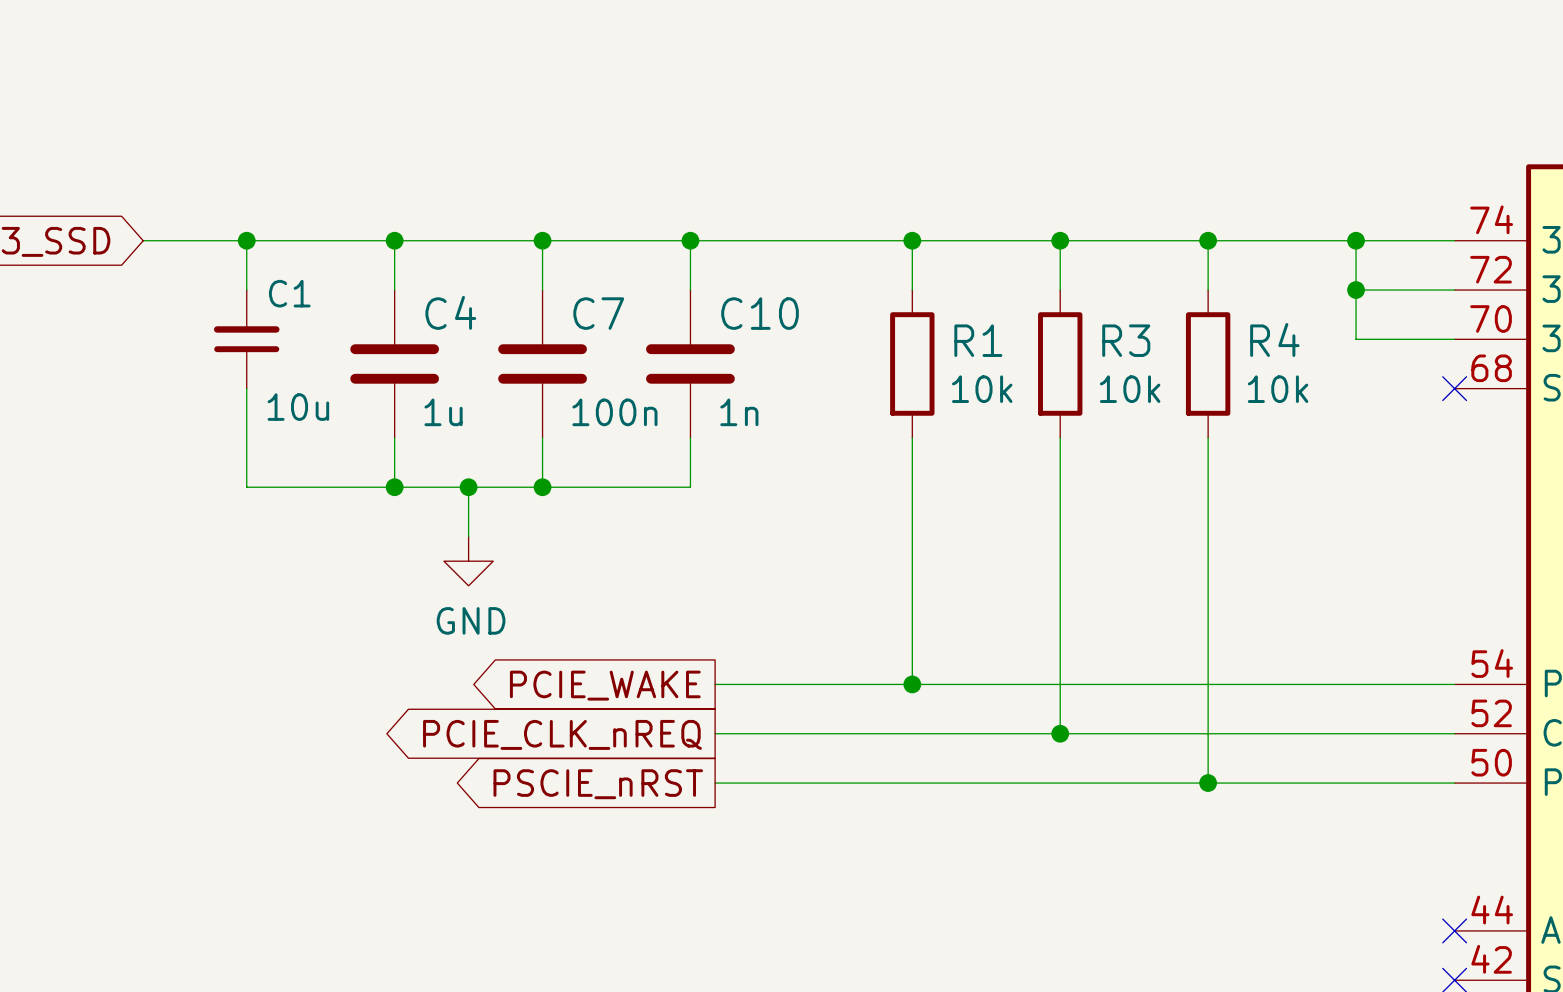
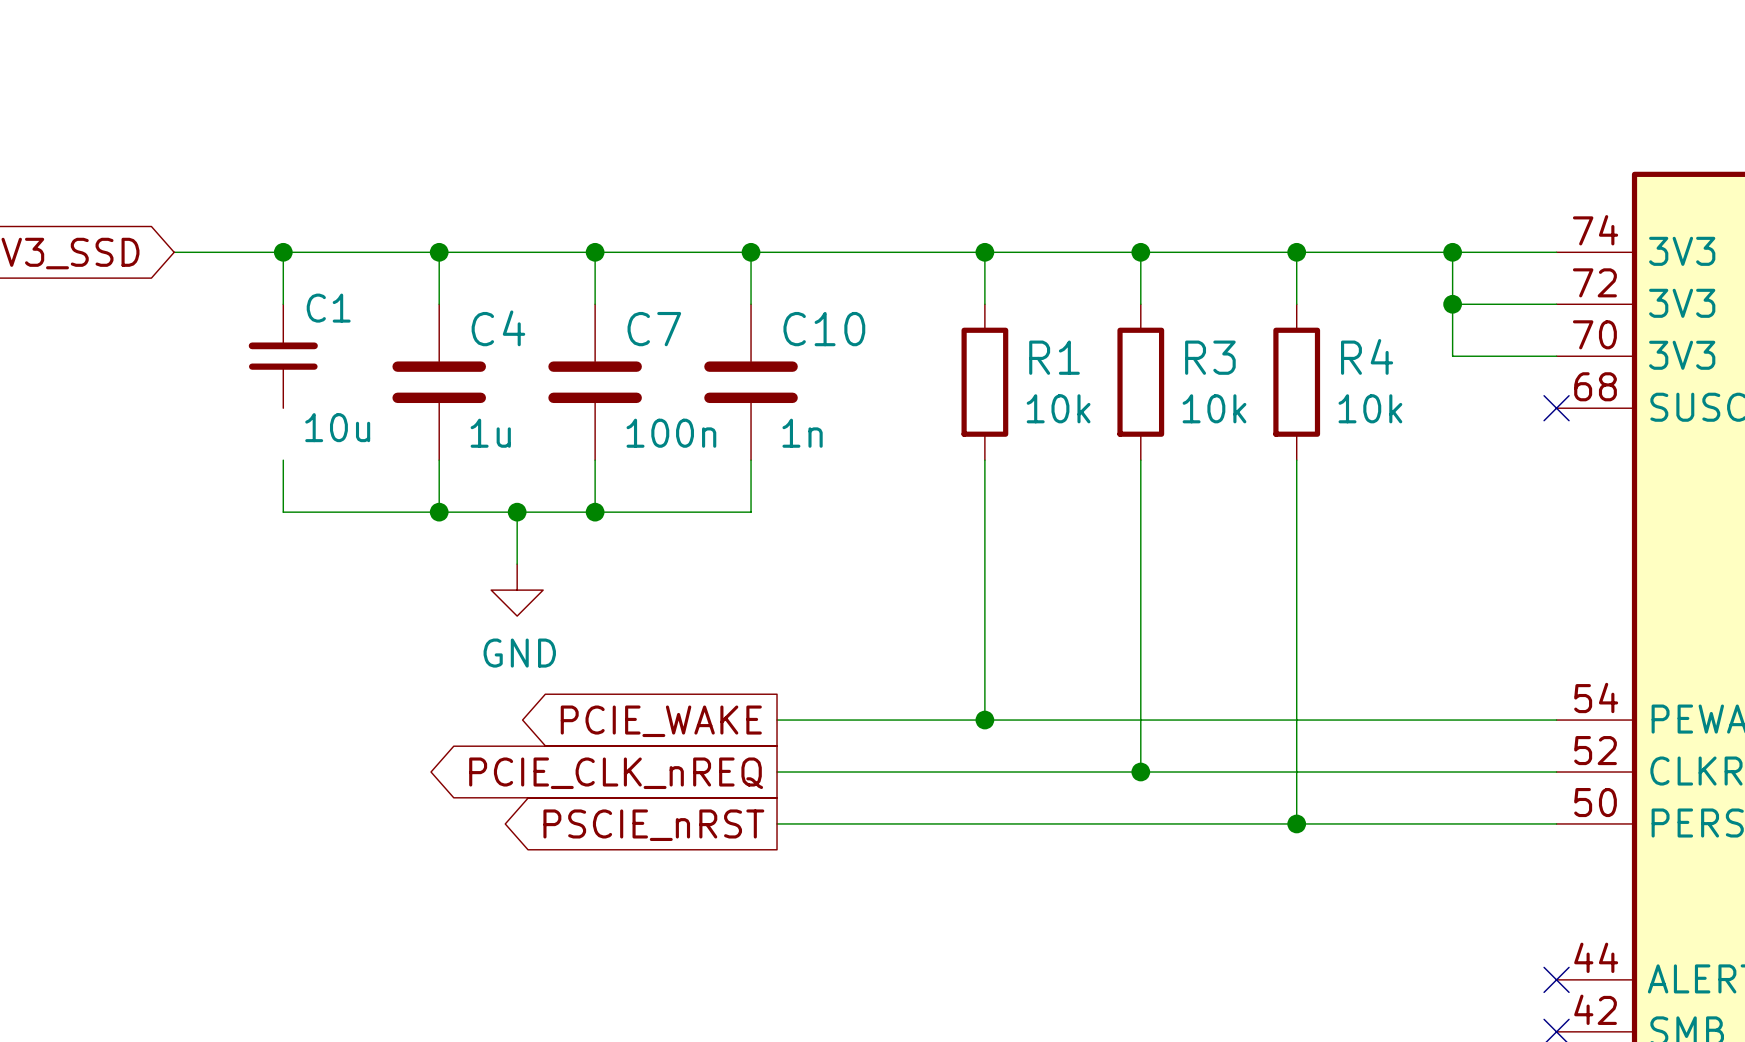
wire: (246, 388) (246, 437) -> none

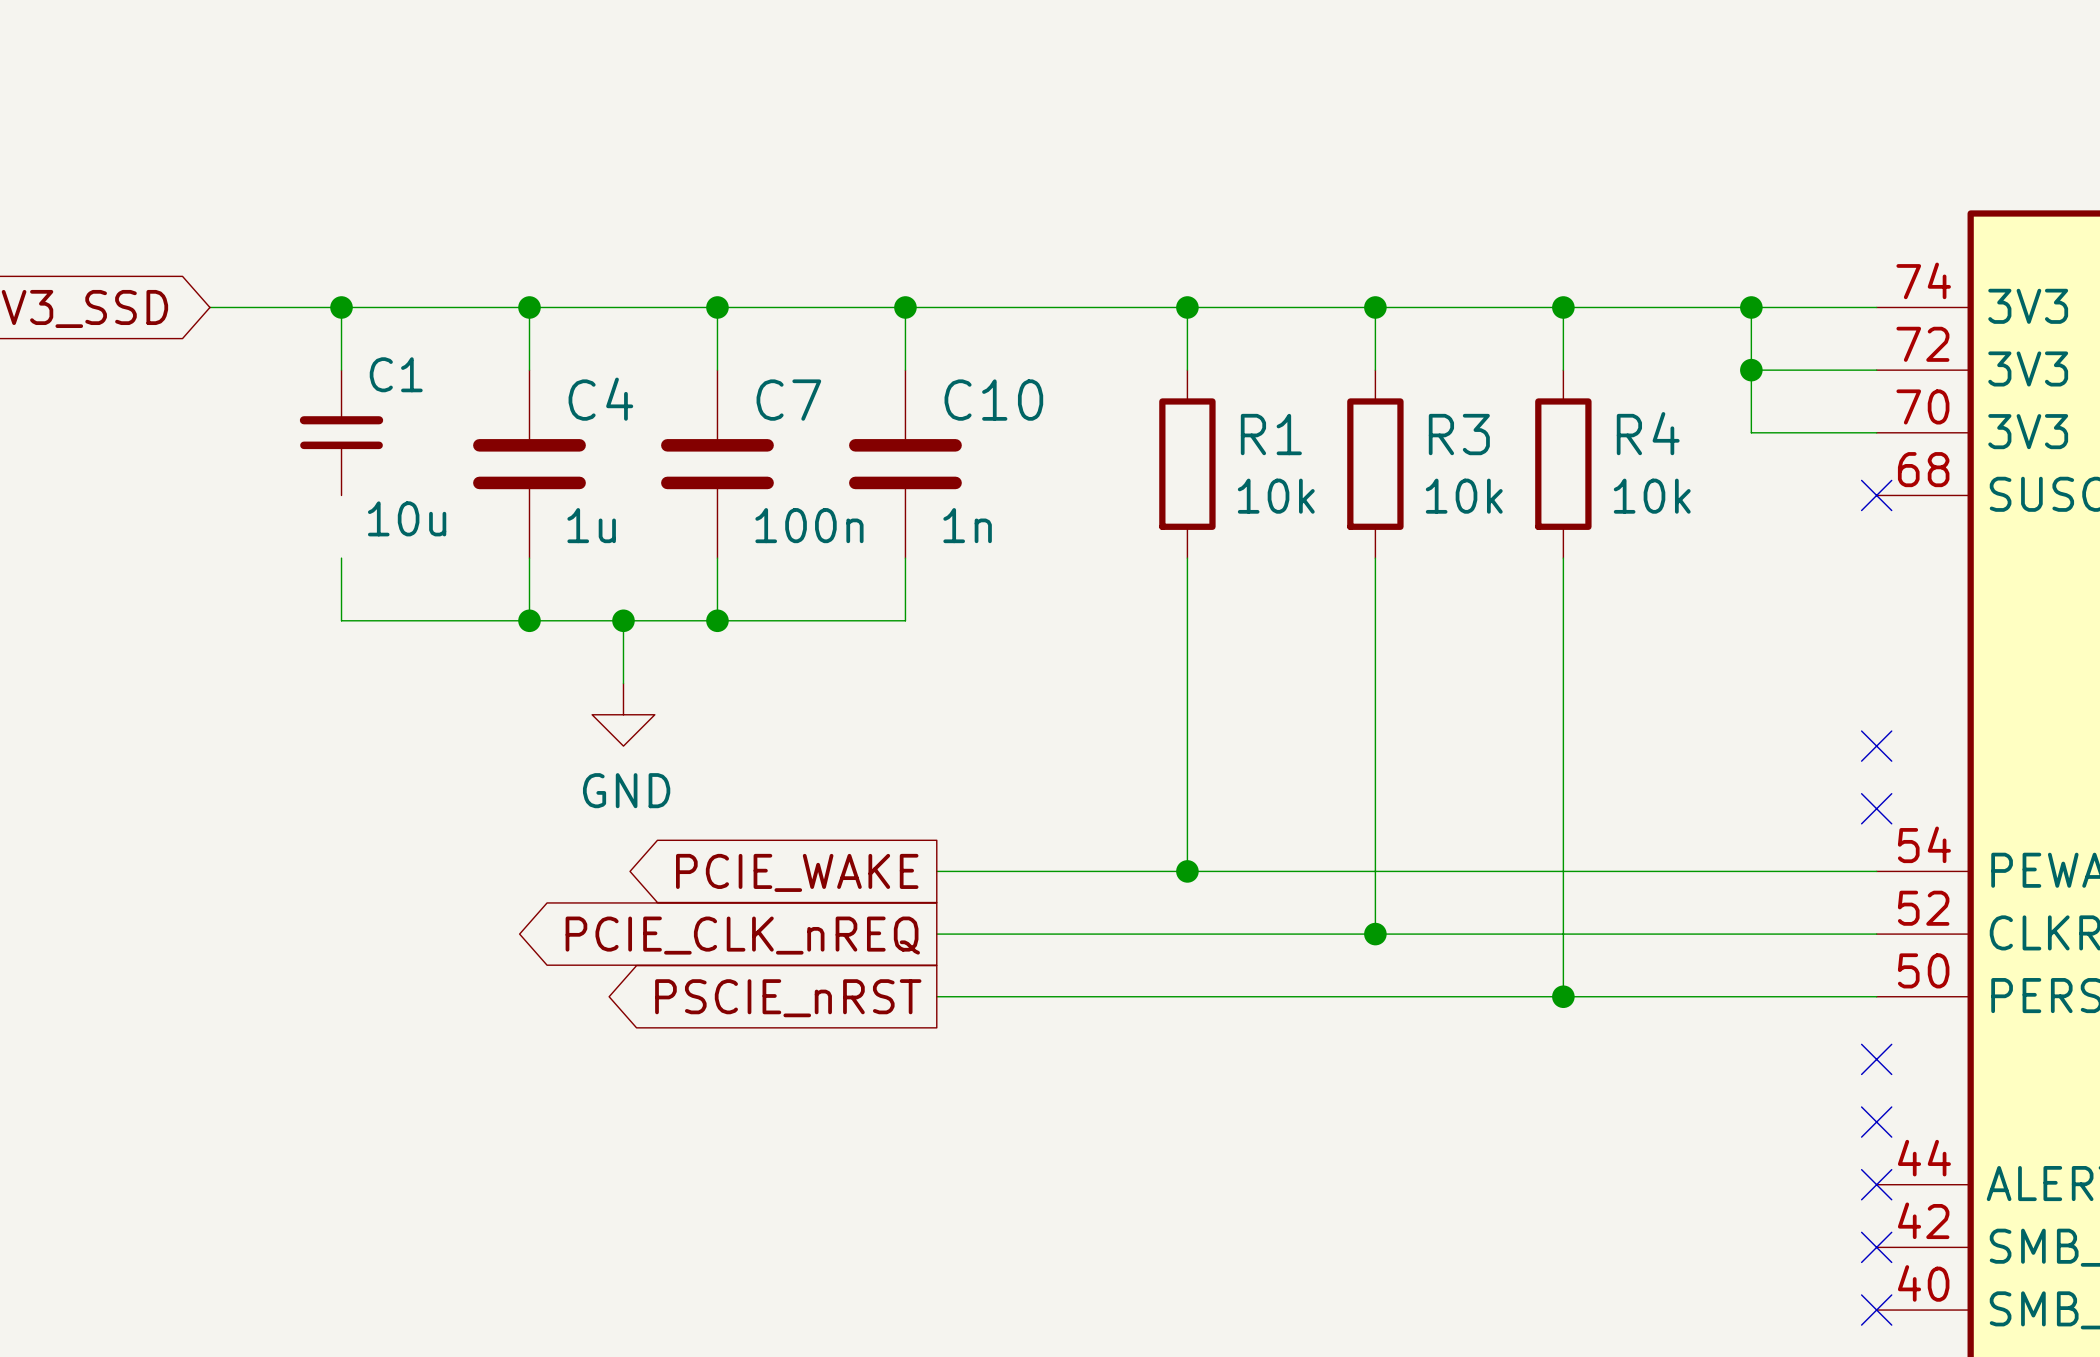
no-connect mark: none -> (1876, 746)
no-connect mark: none -> (1876, 808)
no-connect mark: none -> (1876, 1059)
no-connect mark: none -> (1876, 1122)

